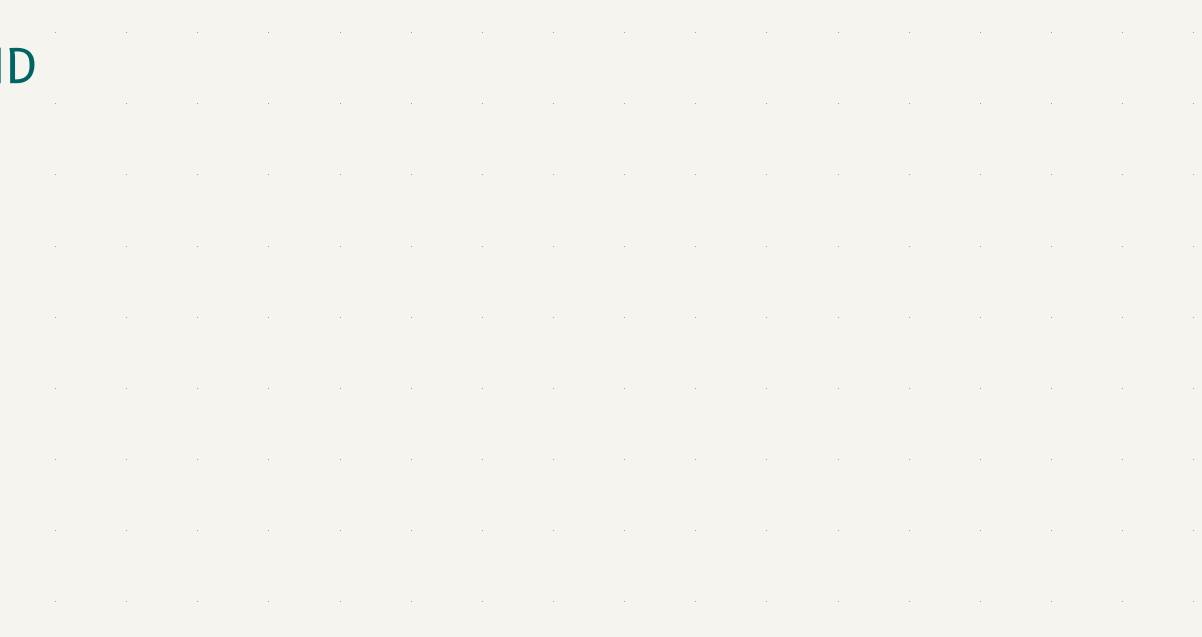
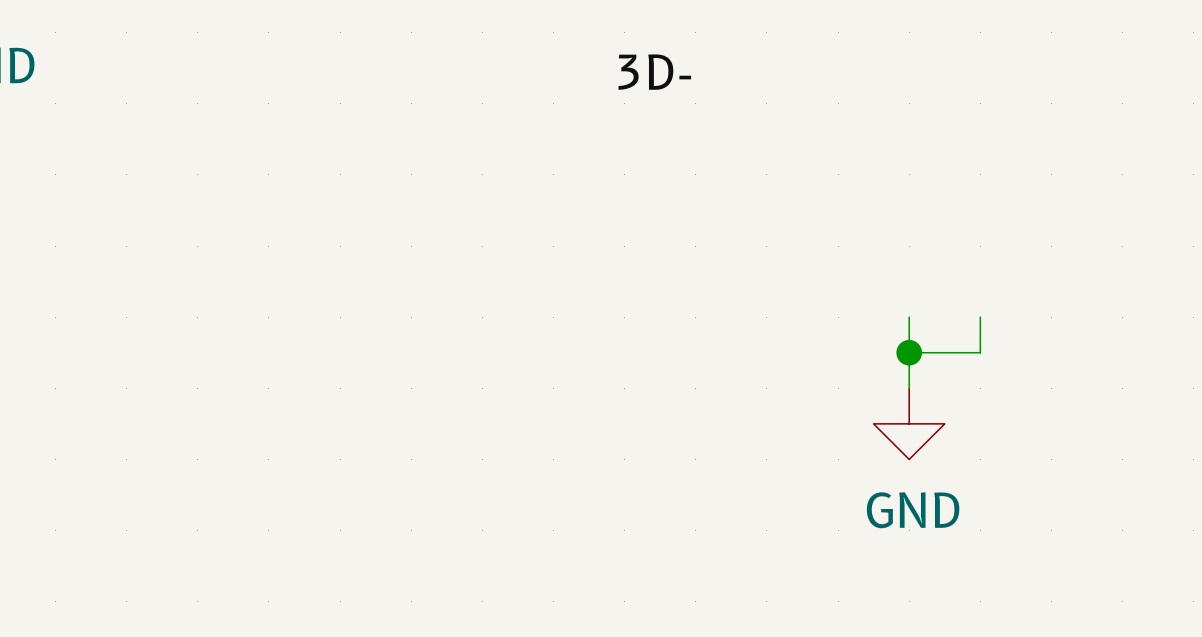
label: none -> 3D- (654, 72)
wire: none -> (909, 317) (909, 388)
wire: none -> (980, 317) (980, 352) (909, 352)
junction: none -> (909, 352)
power symbol: none -> GND (909, 423)

